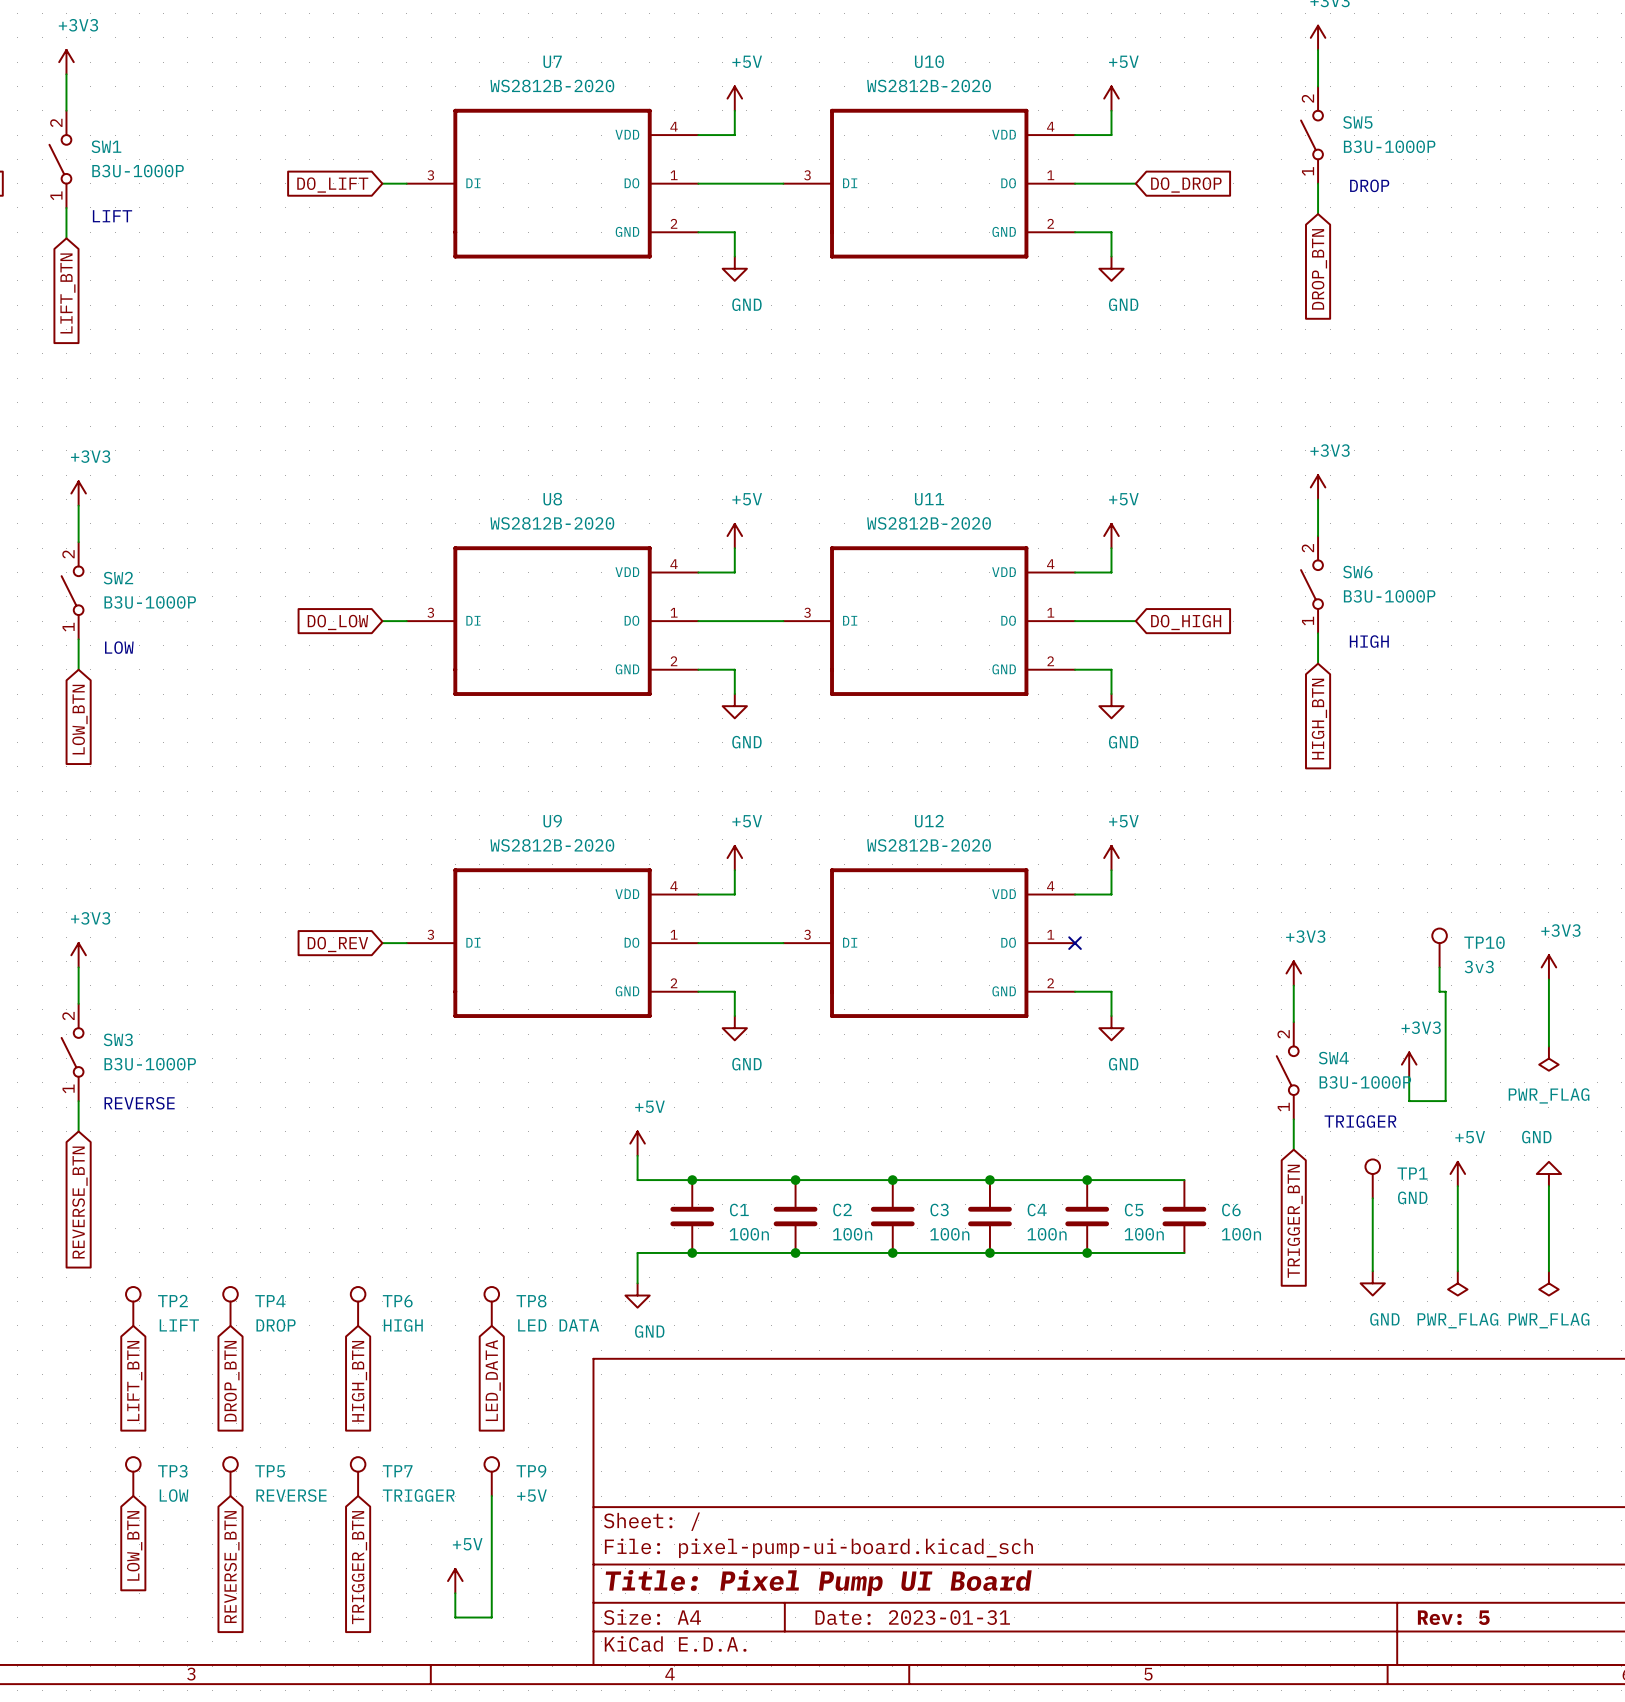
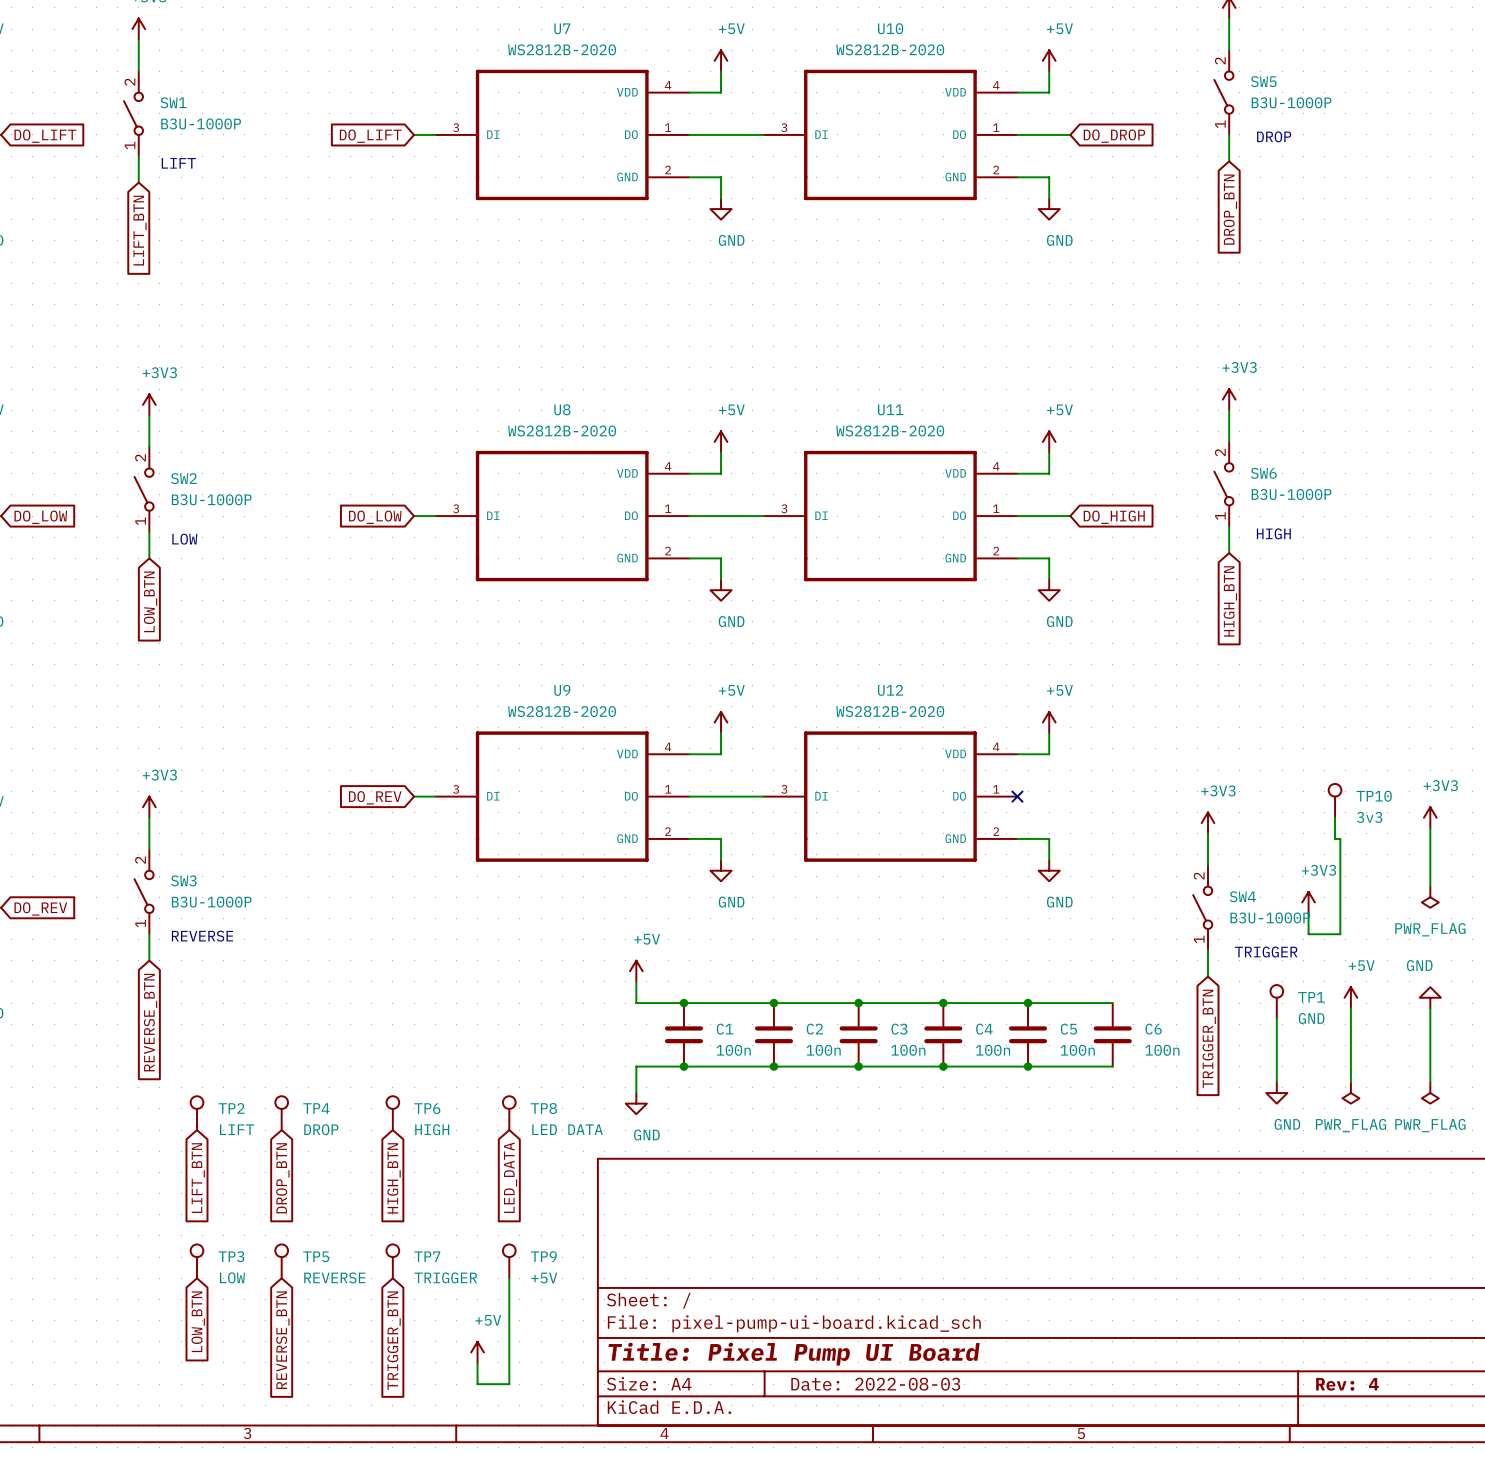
title block: Date: 2023-01-31 (912, 1617) -> Date: 2022-08-03 (875, 1384)
title block: Rev: 5 (1453, 1617) -> Rev: 4 (1347, 1384)

